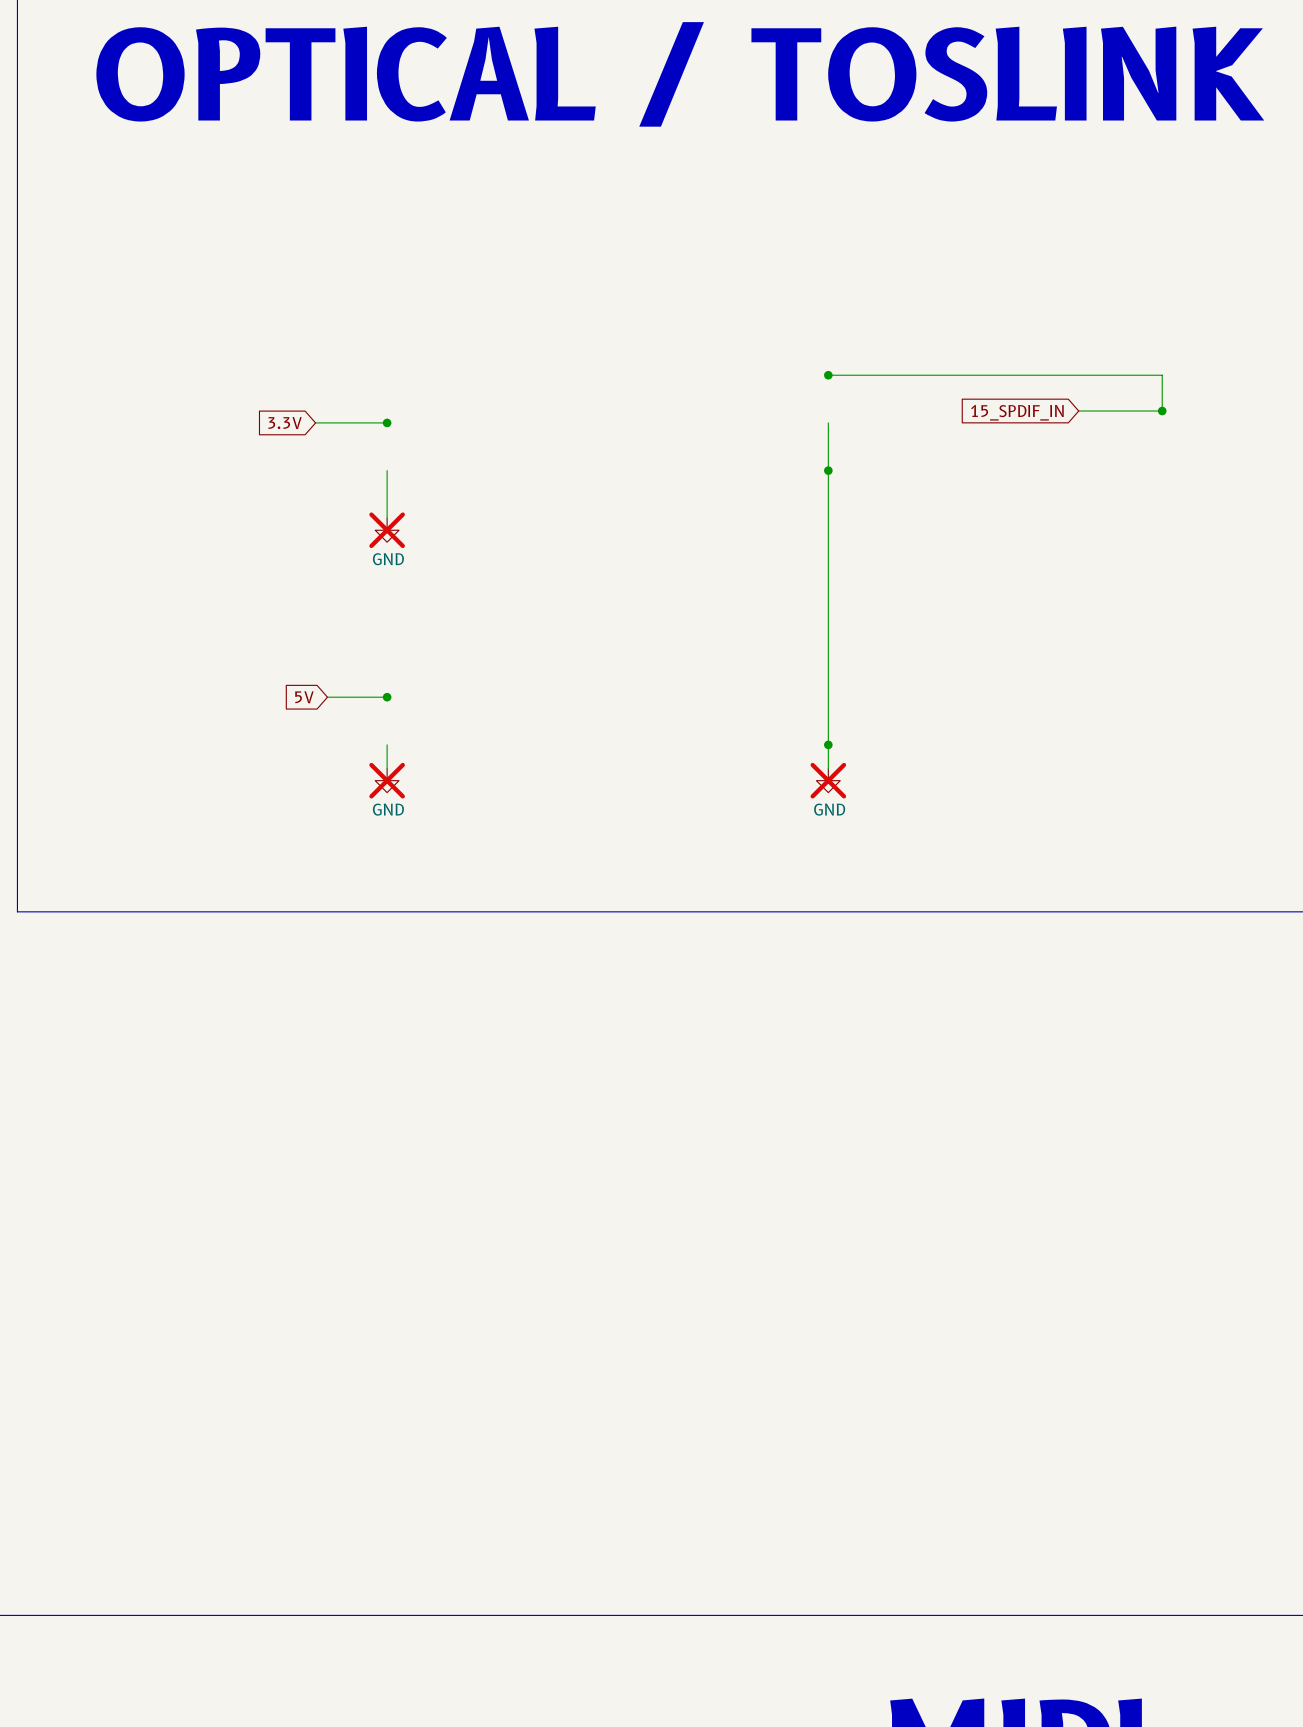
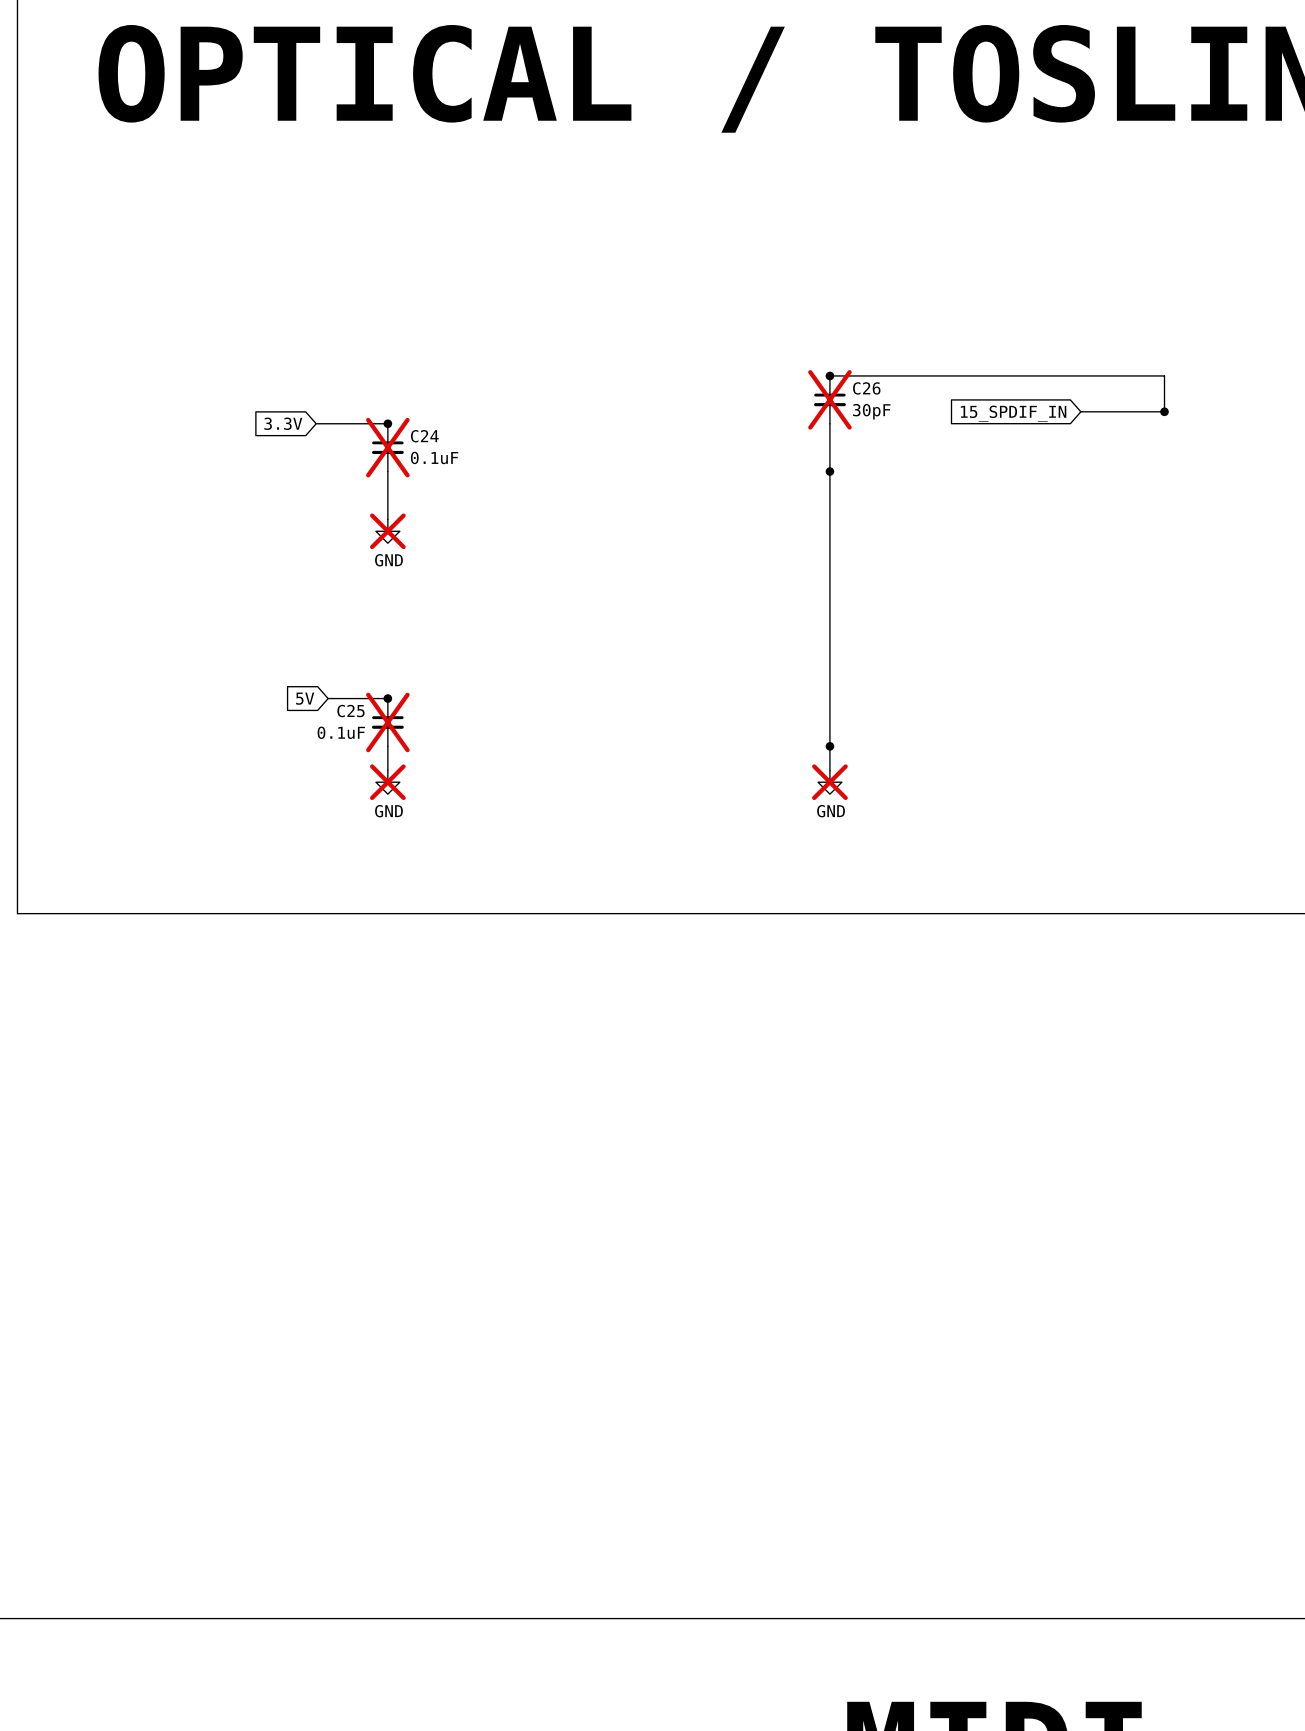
C26: none -> 30pF (829, 399)
C24: none -> 0.1uF (387, 447)
C25: none -> 0.1uF (387, 722)

